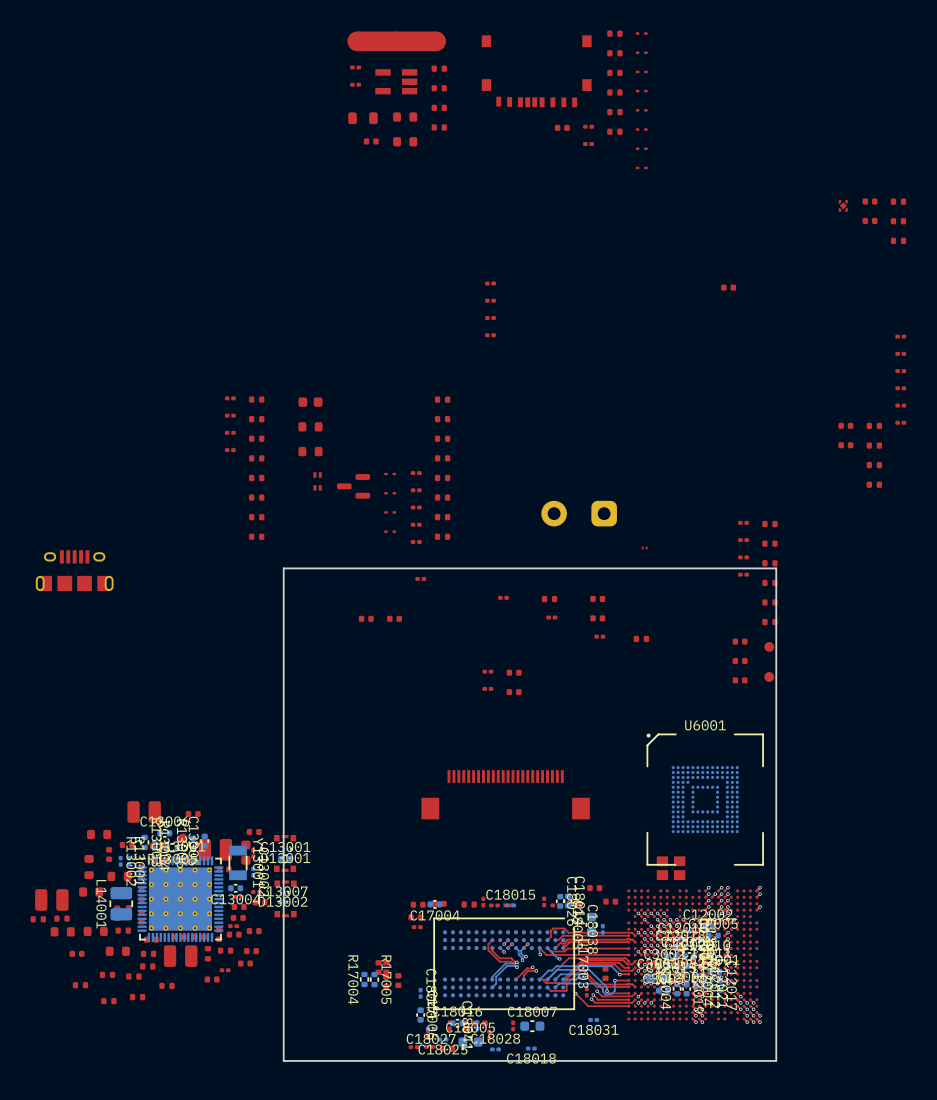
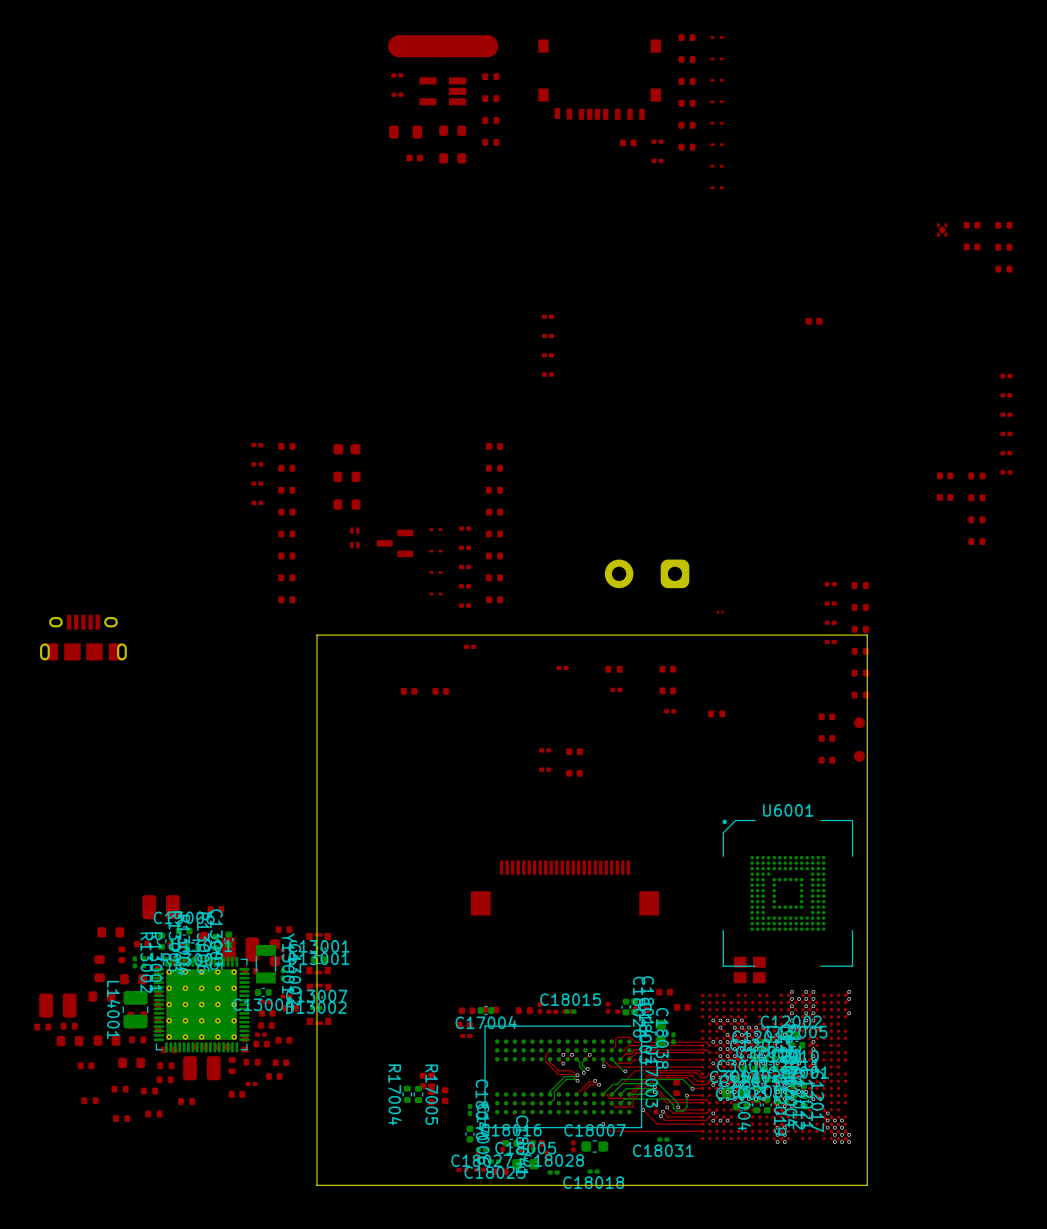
top track: none -> (603, 1124) (610, 1131) (702, 1131)
via: none -> (603, 1124)

